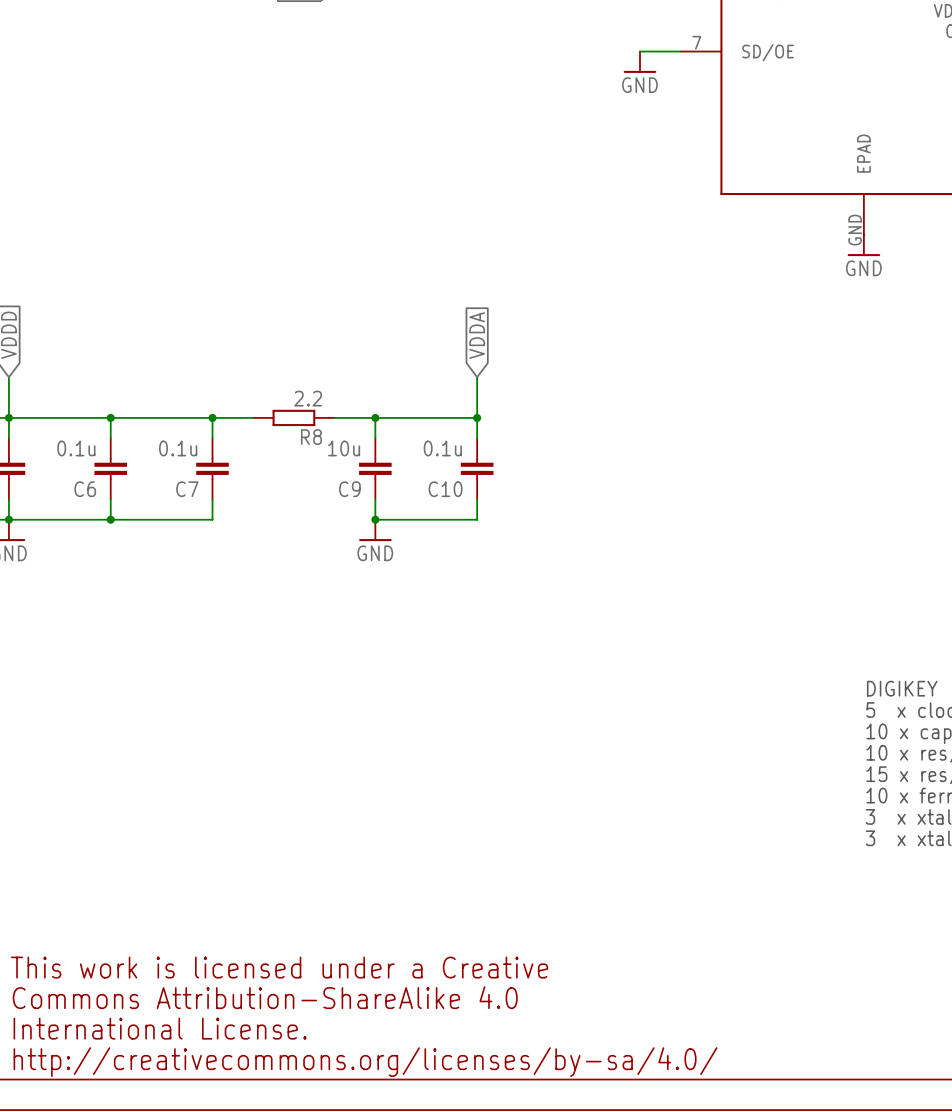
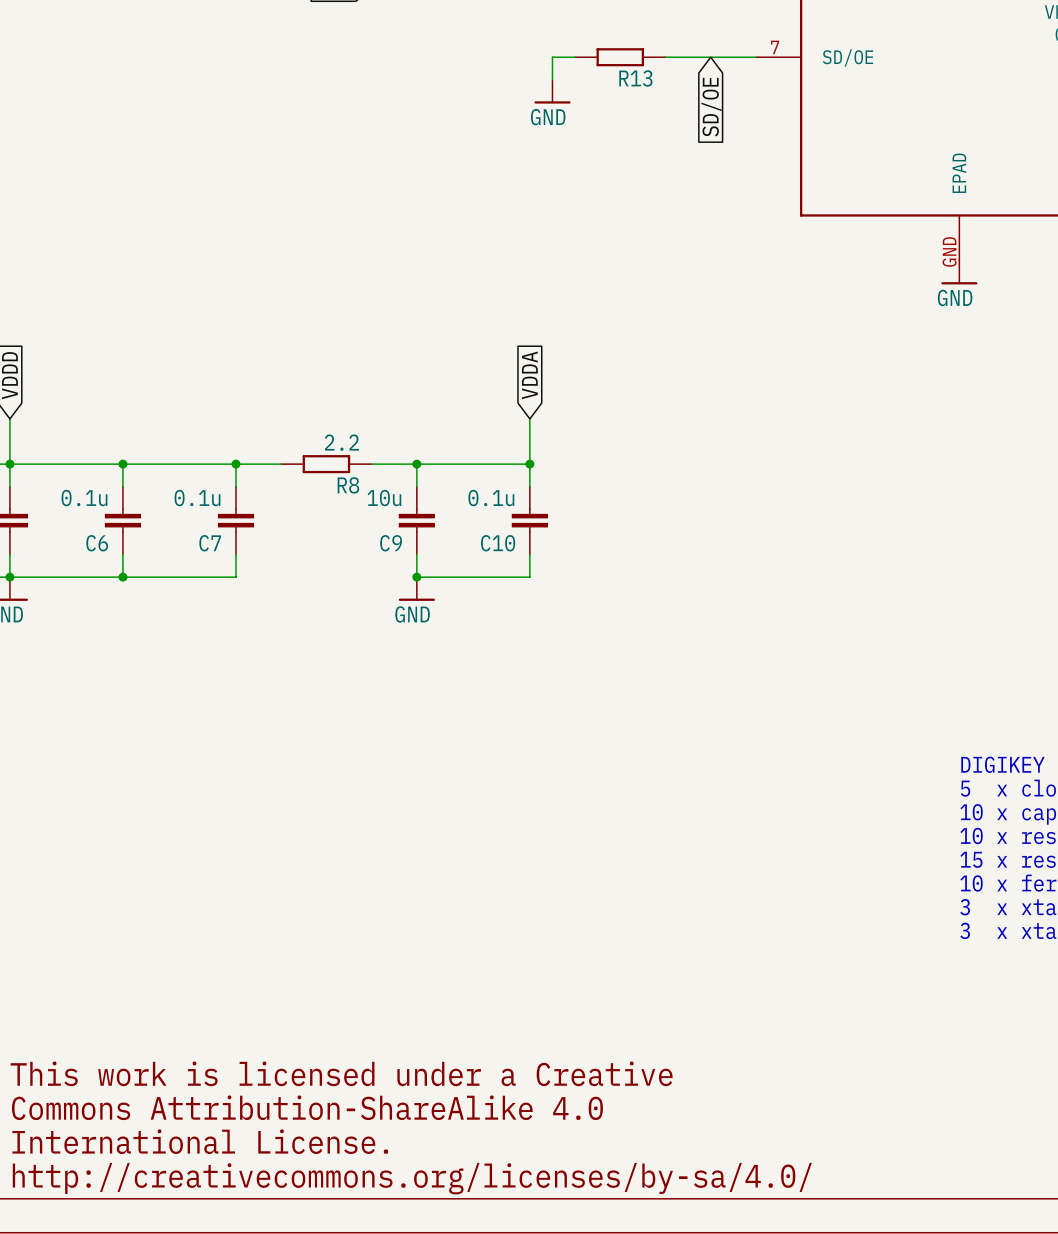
wire: none -> (575, 57) (552, 57) (552, 79)
R13: none -> (620, 57)
wire: none -> (665, 57) (710, 57)
power symbol position: GND (639, 62) -> GND (552, 91)
global label: none -> SD/OE (711, 107)

